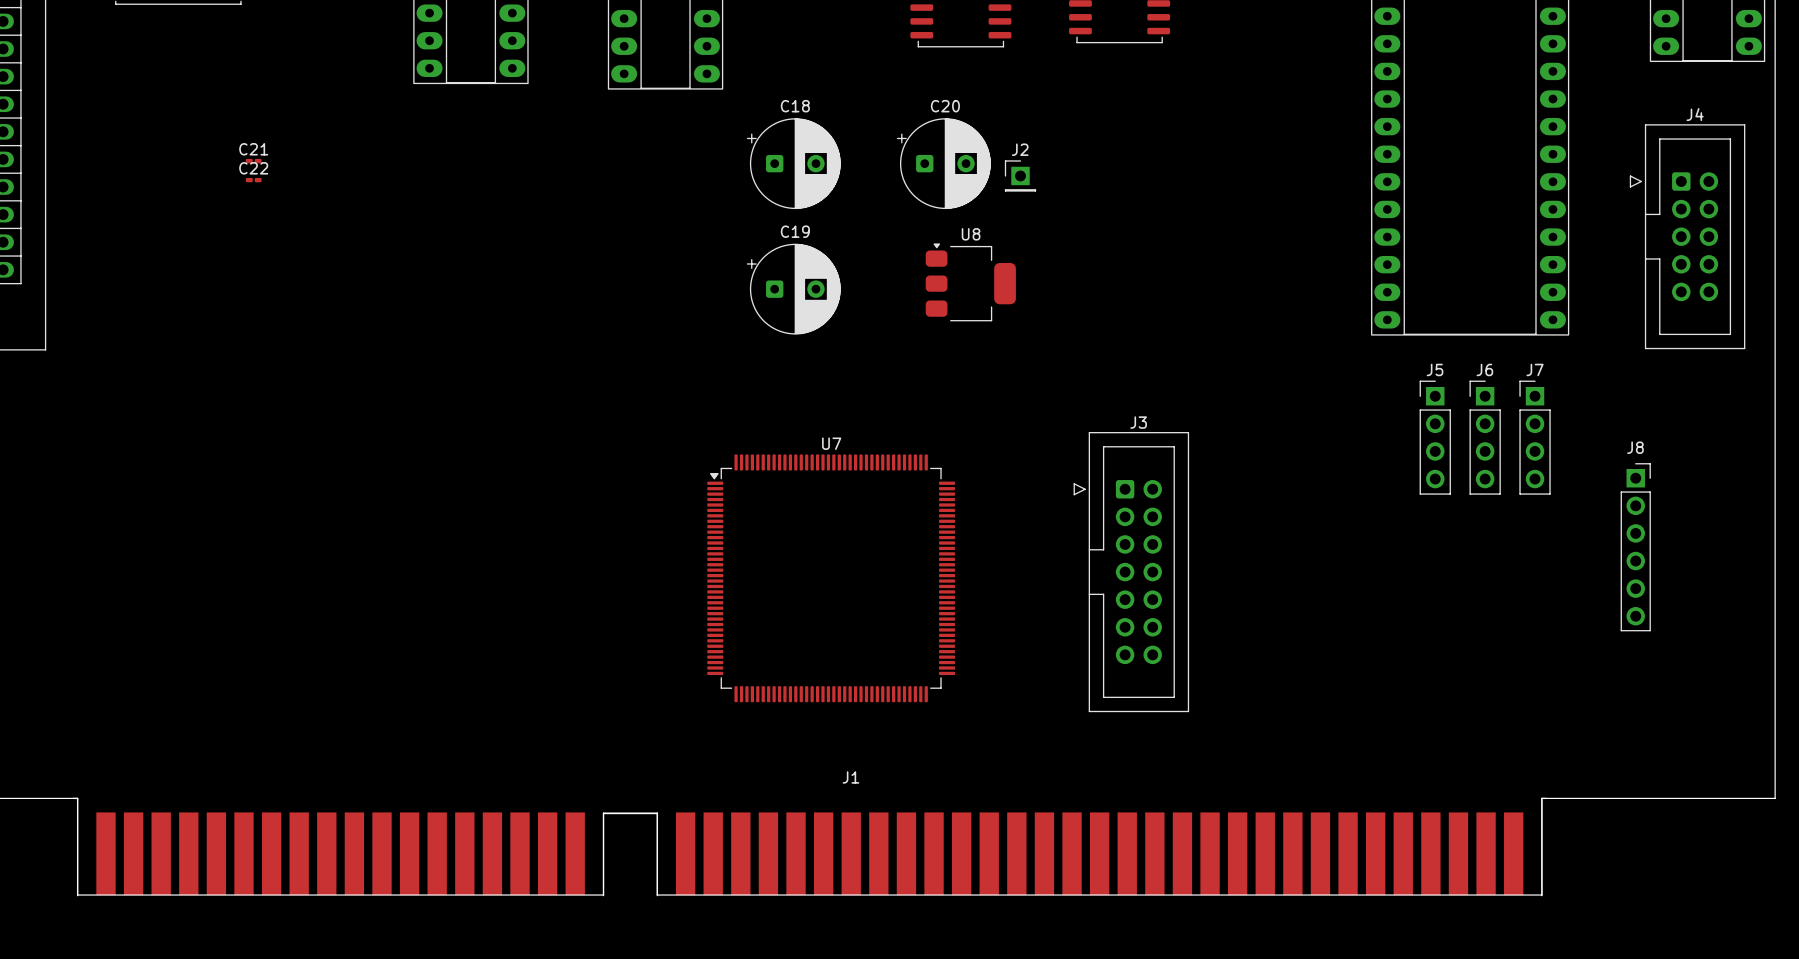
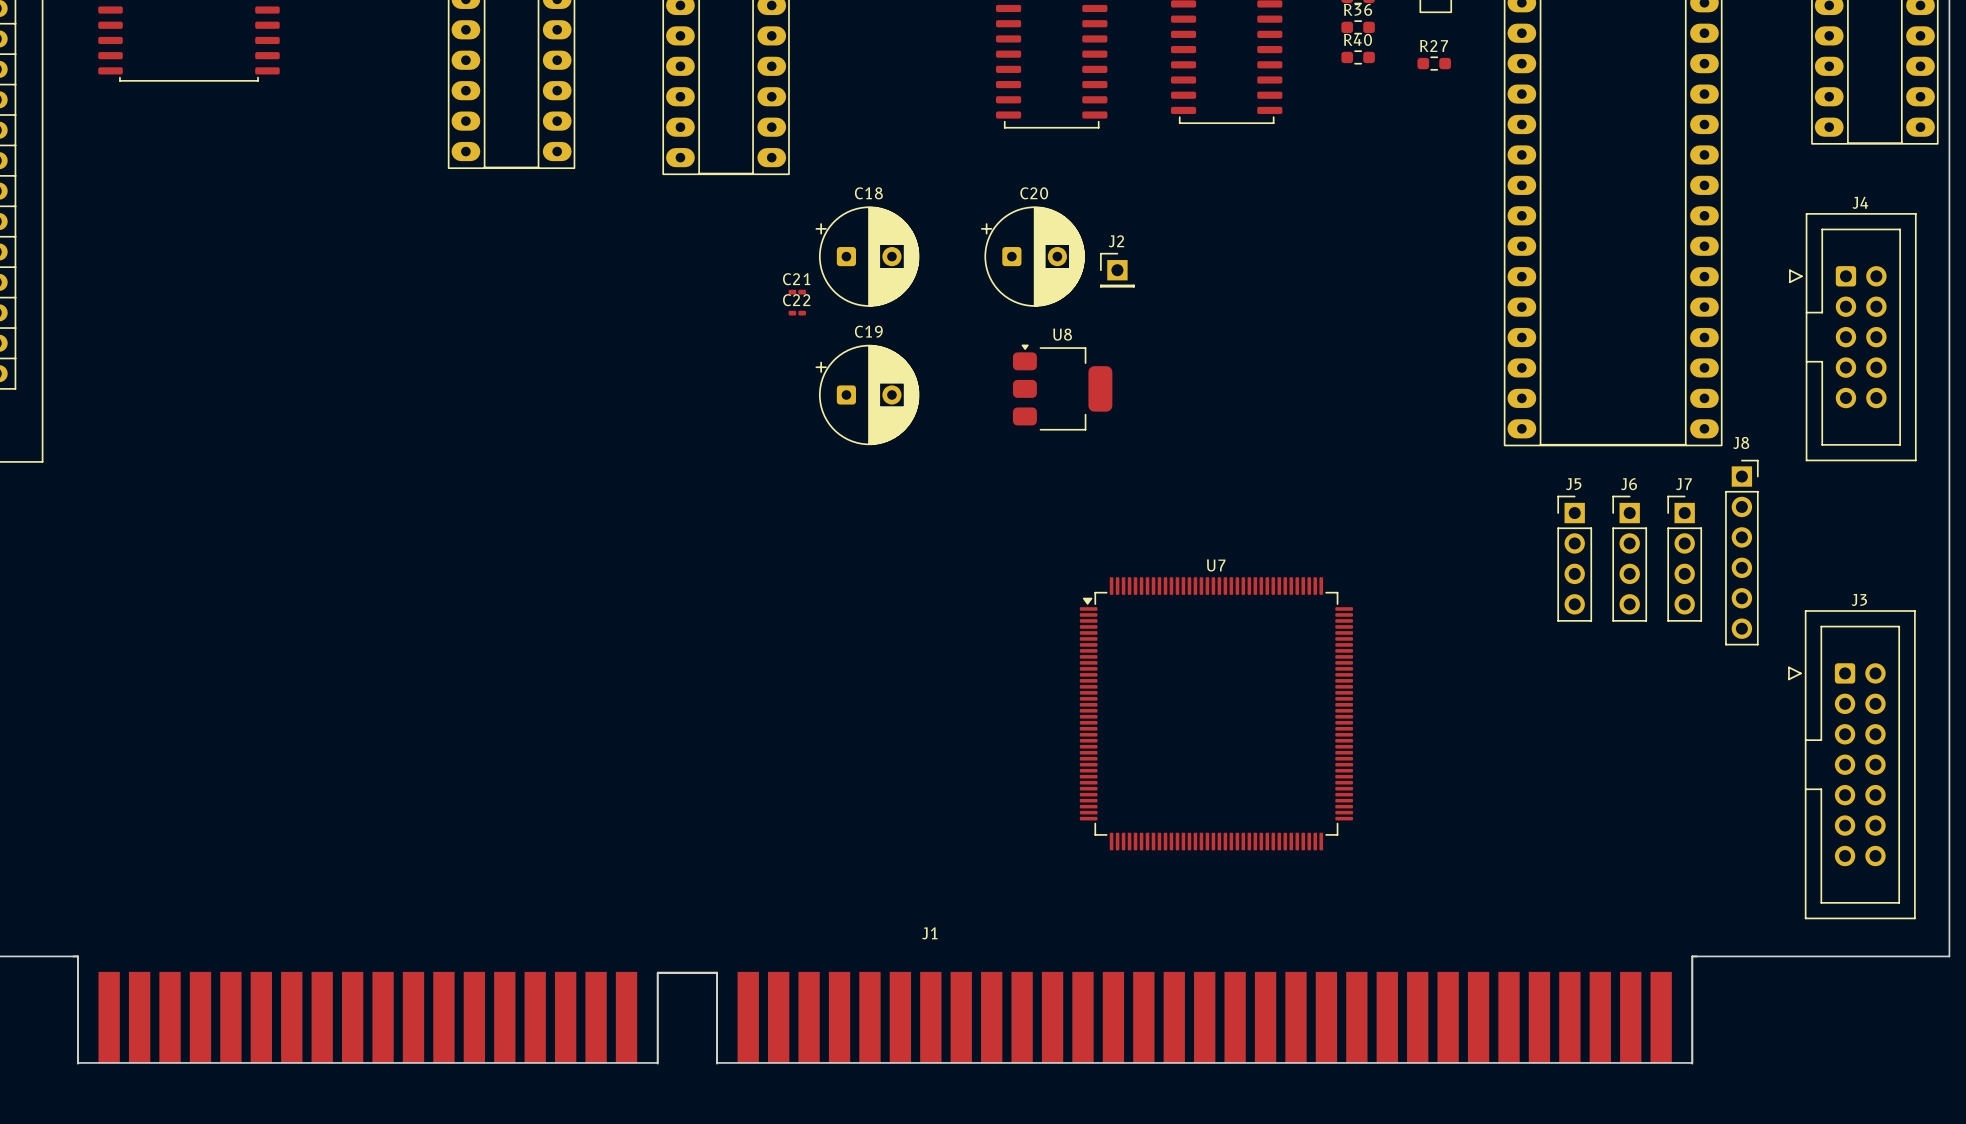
C21 position: (253, 161) -> (797, 292)
C22 position: (253, 180) -> (797, 313)
J8 position: (1635, 547) -> (1741, 552)
J3 position: (1131, 572) -> (1851, 764)
U7 position: (831, 578) -> (1216, 713)

